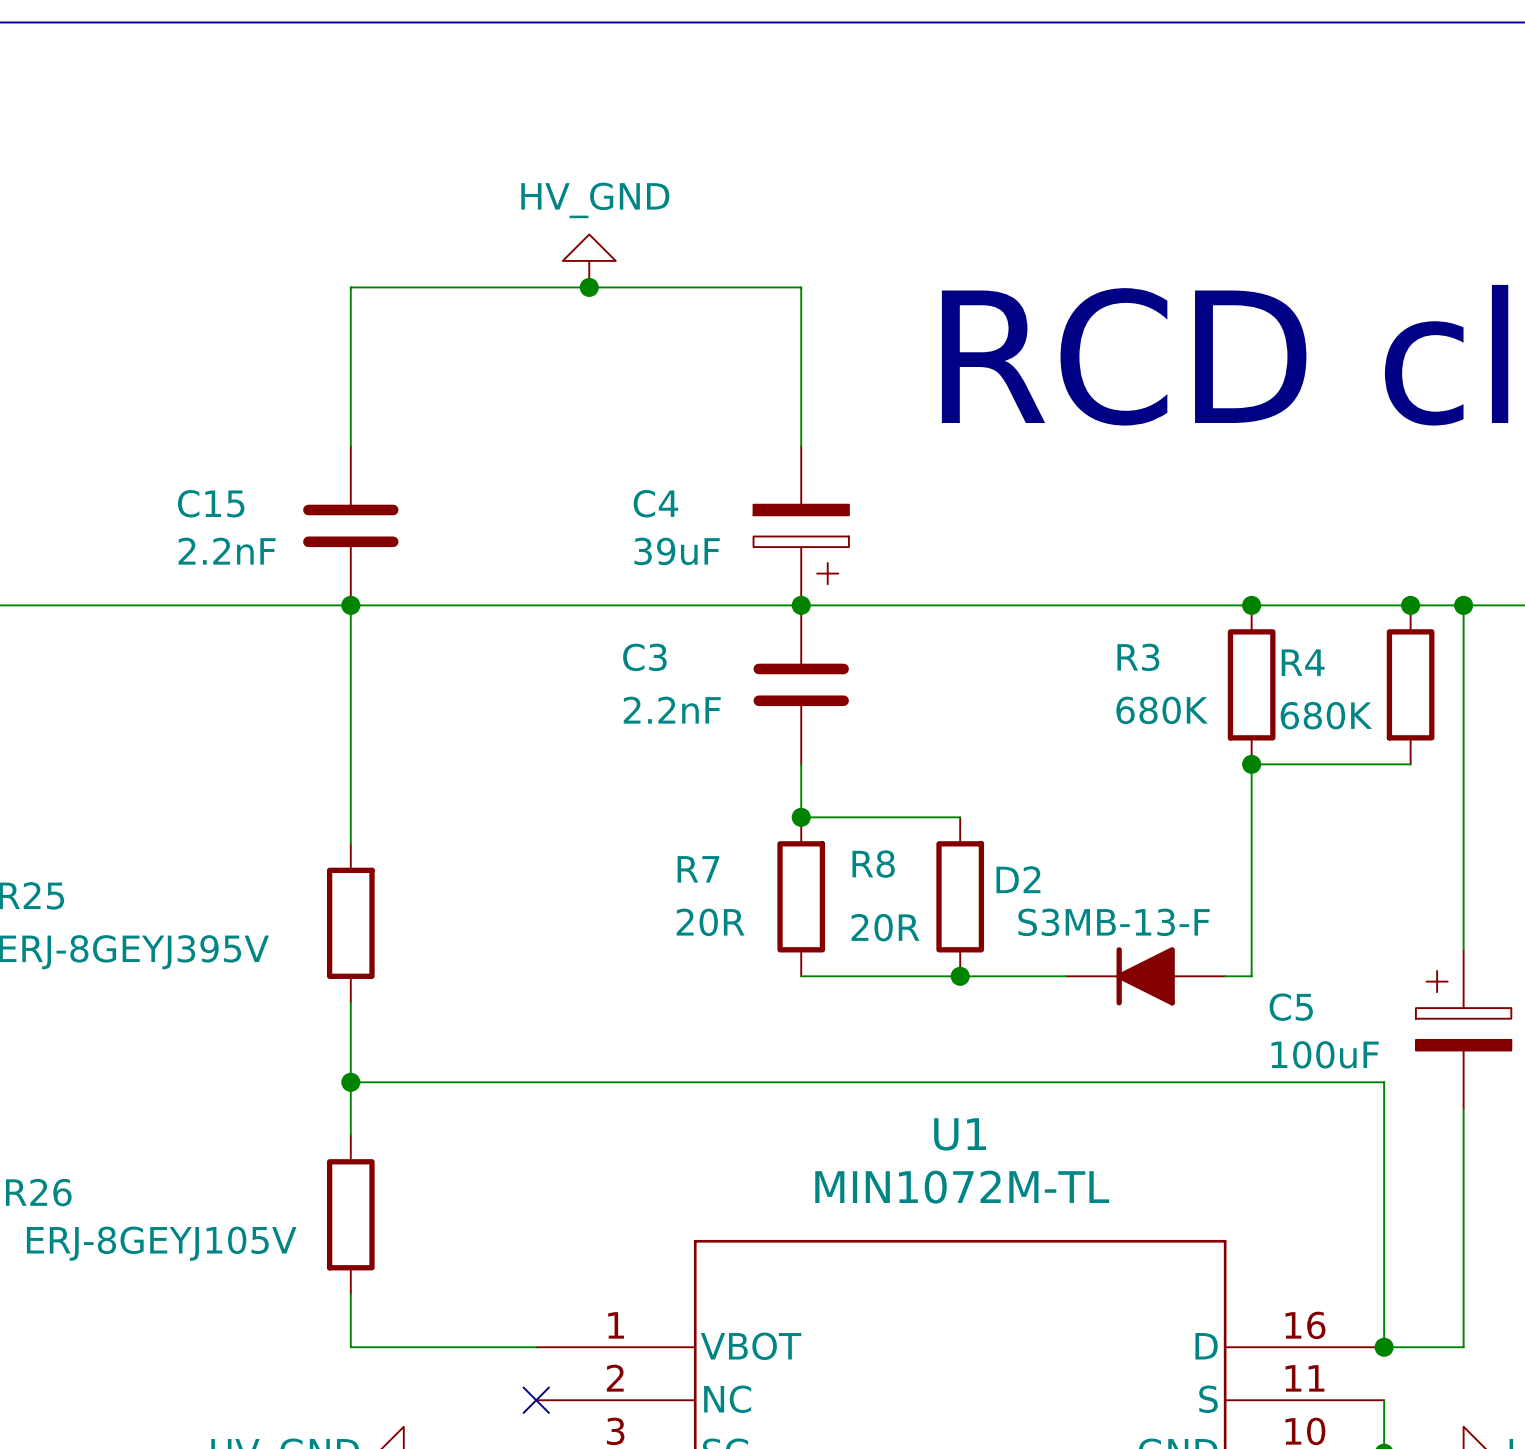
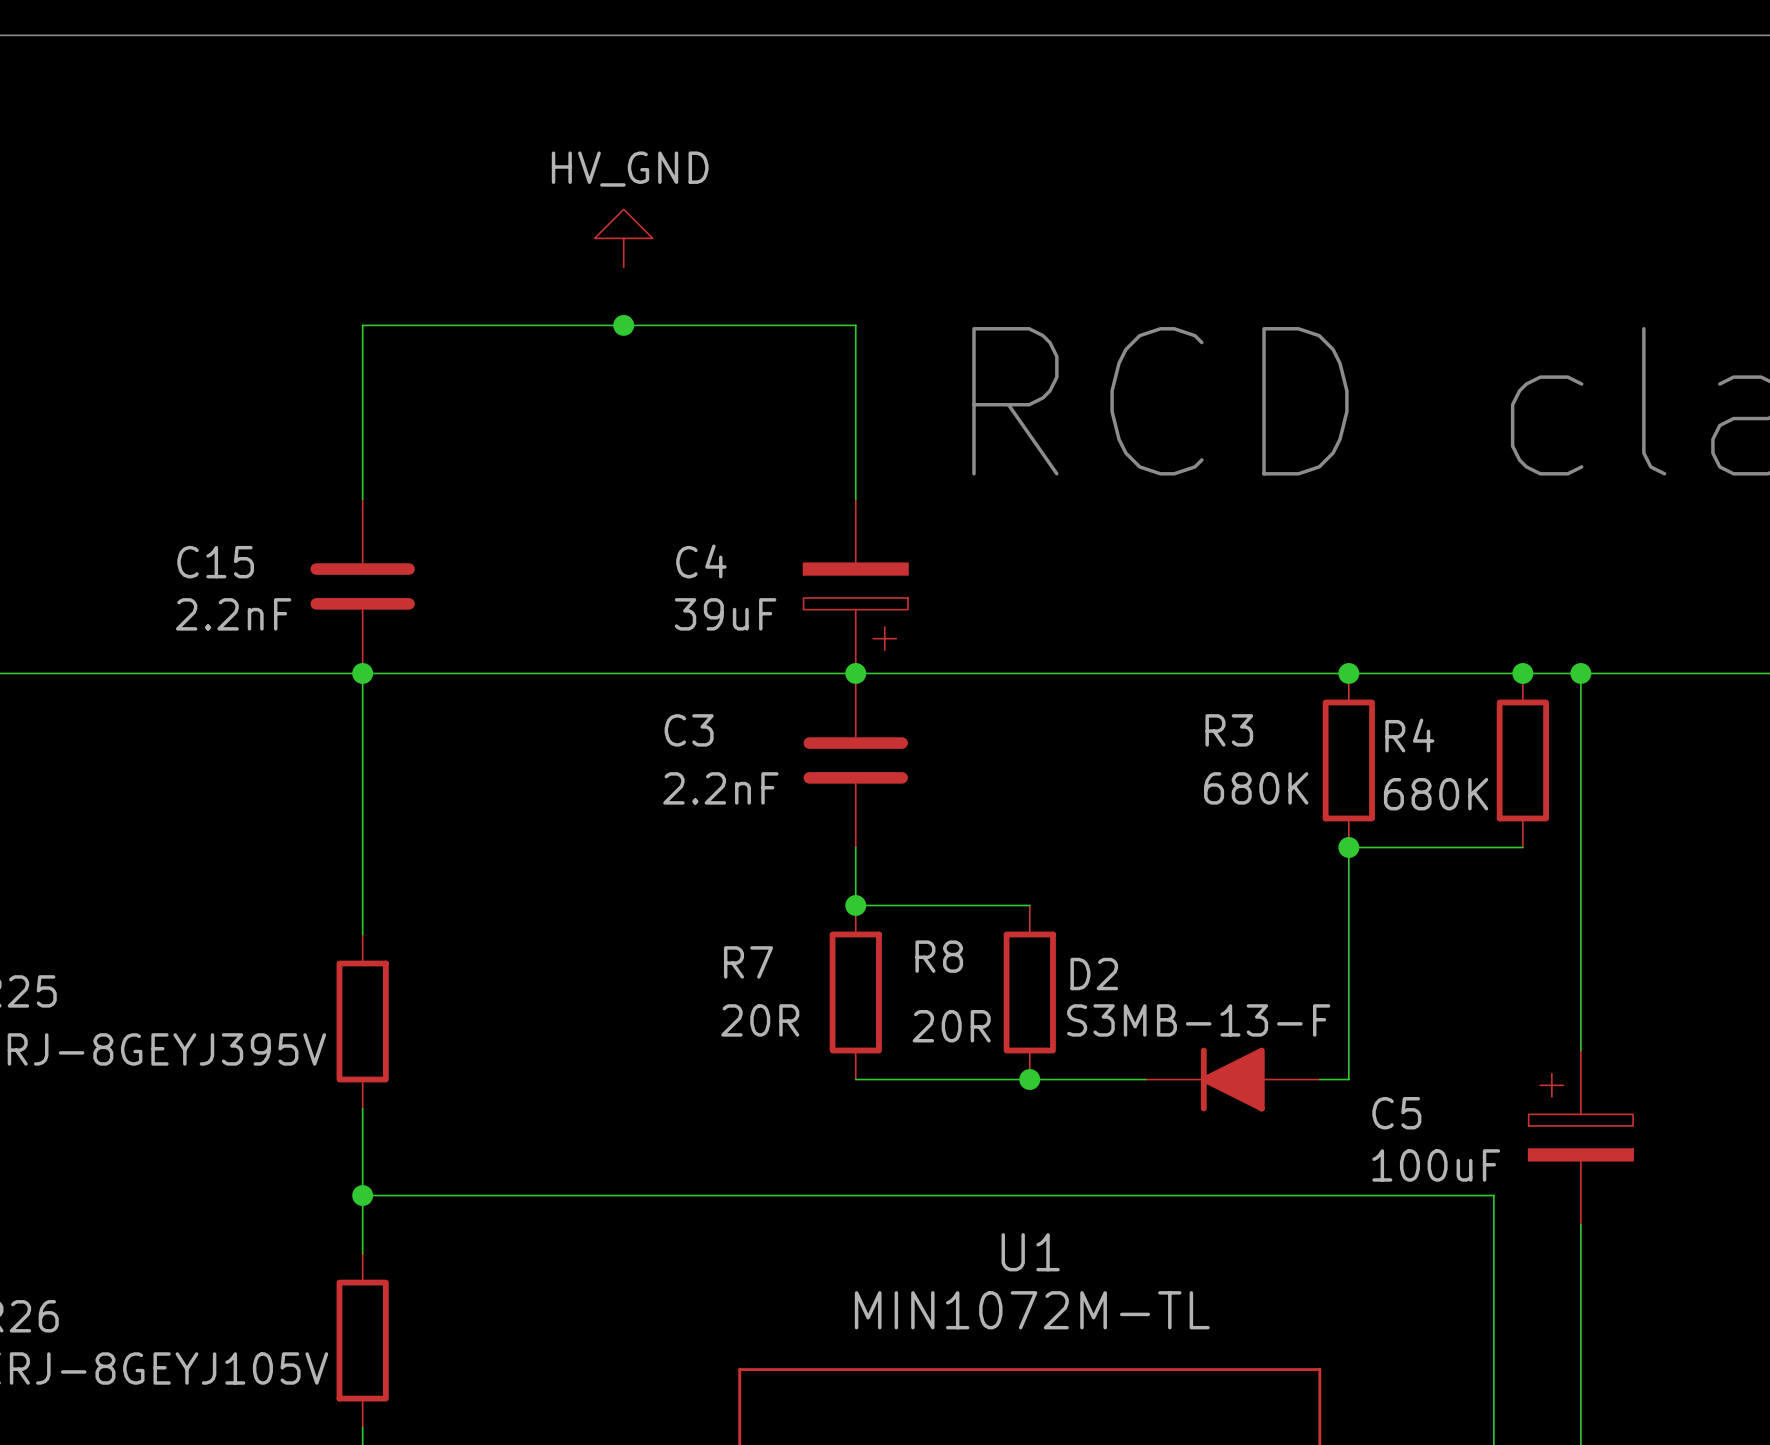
power symbol position: HV_GND (589, 260) -> HV_GND (623, 238)

